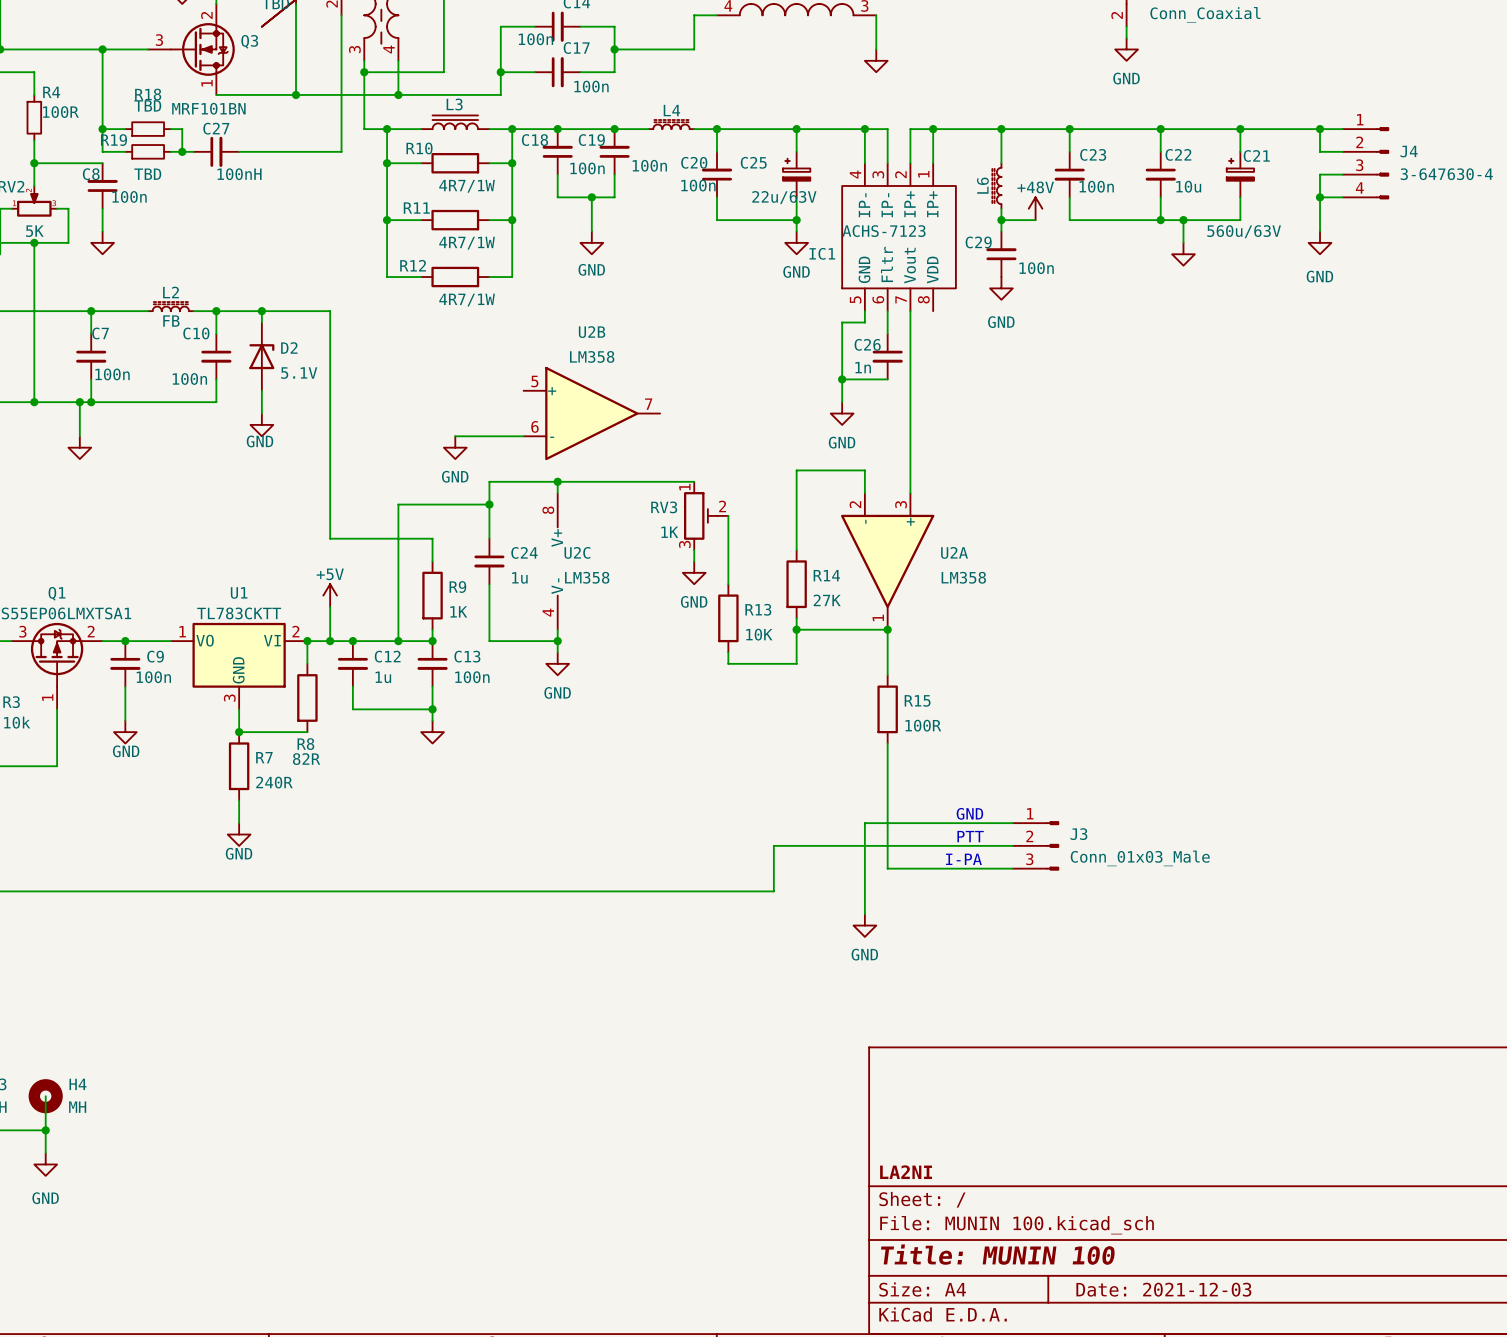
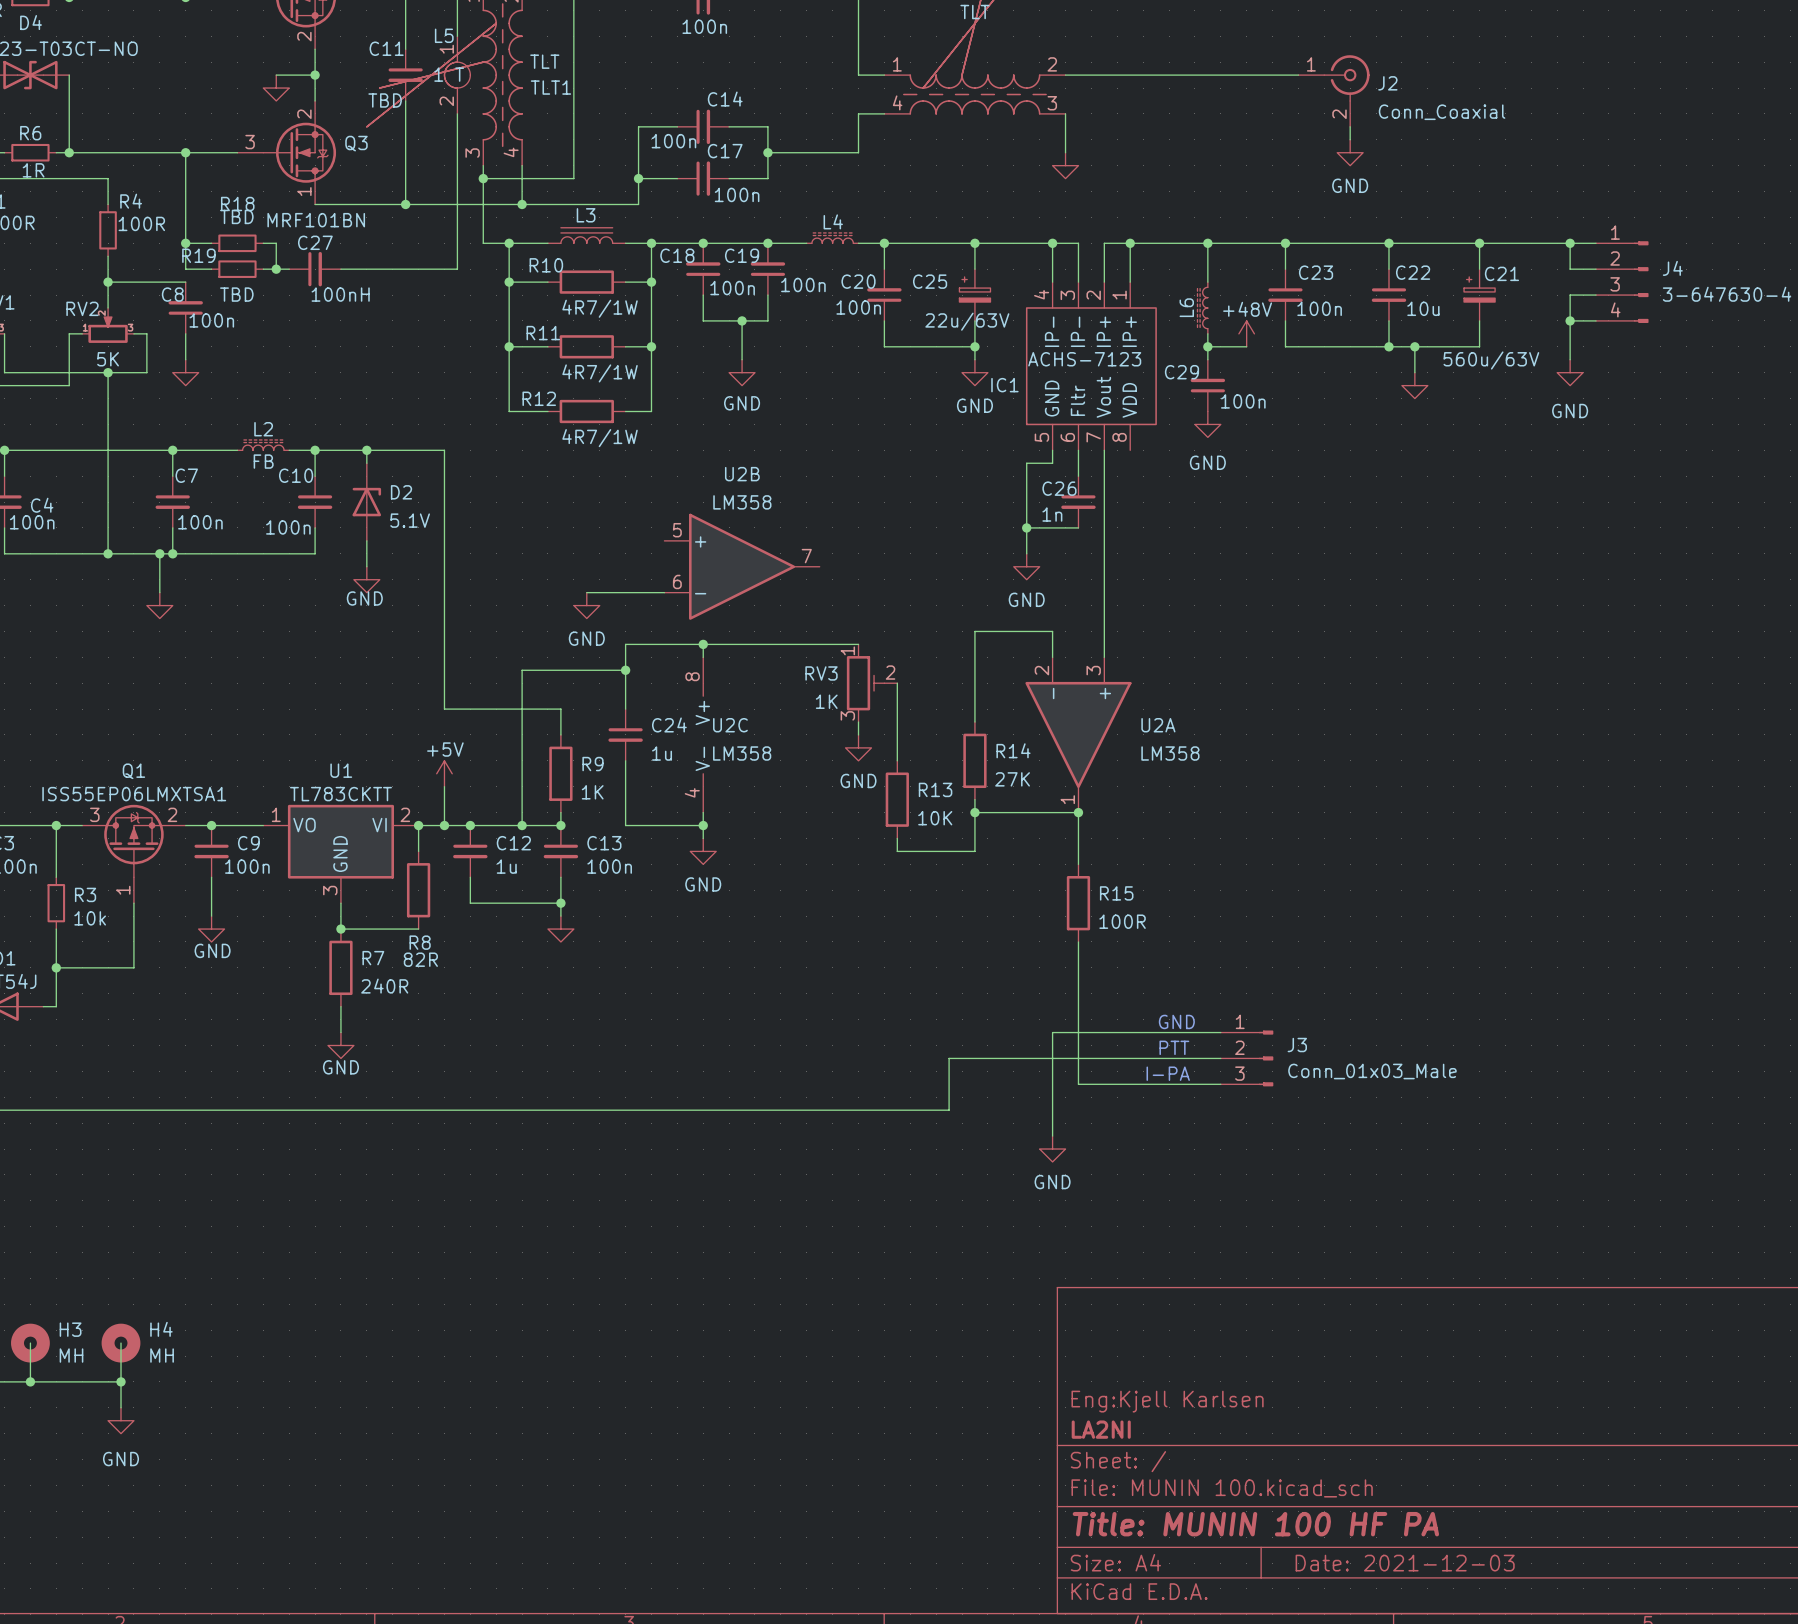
title block: none -> Eng:Kjell Karlsen (1167, 1401)
title block: Title: MUNIN 100 (998, 1254) -> Title: MUNIN 100 HF PA (1255, 1524)

